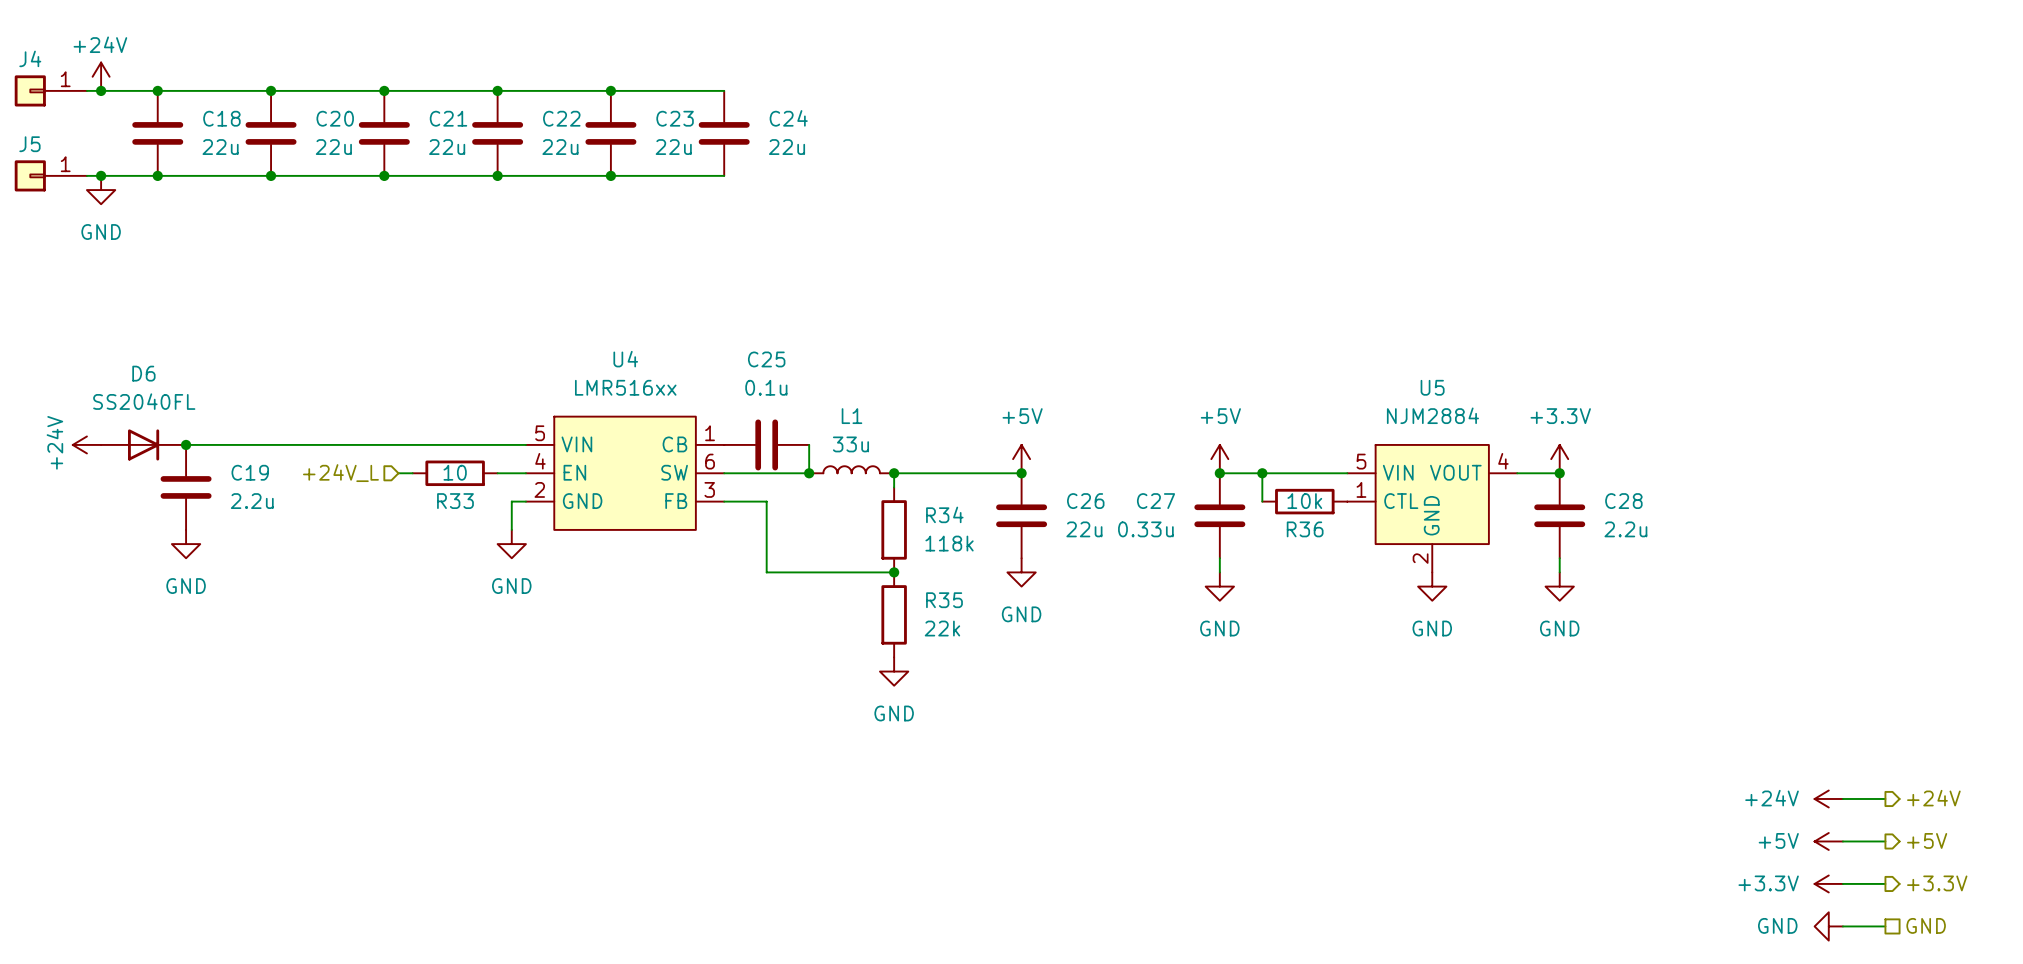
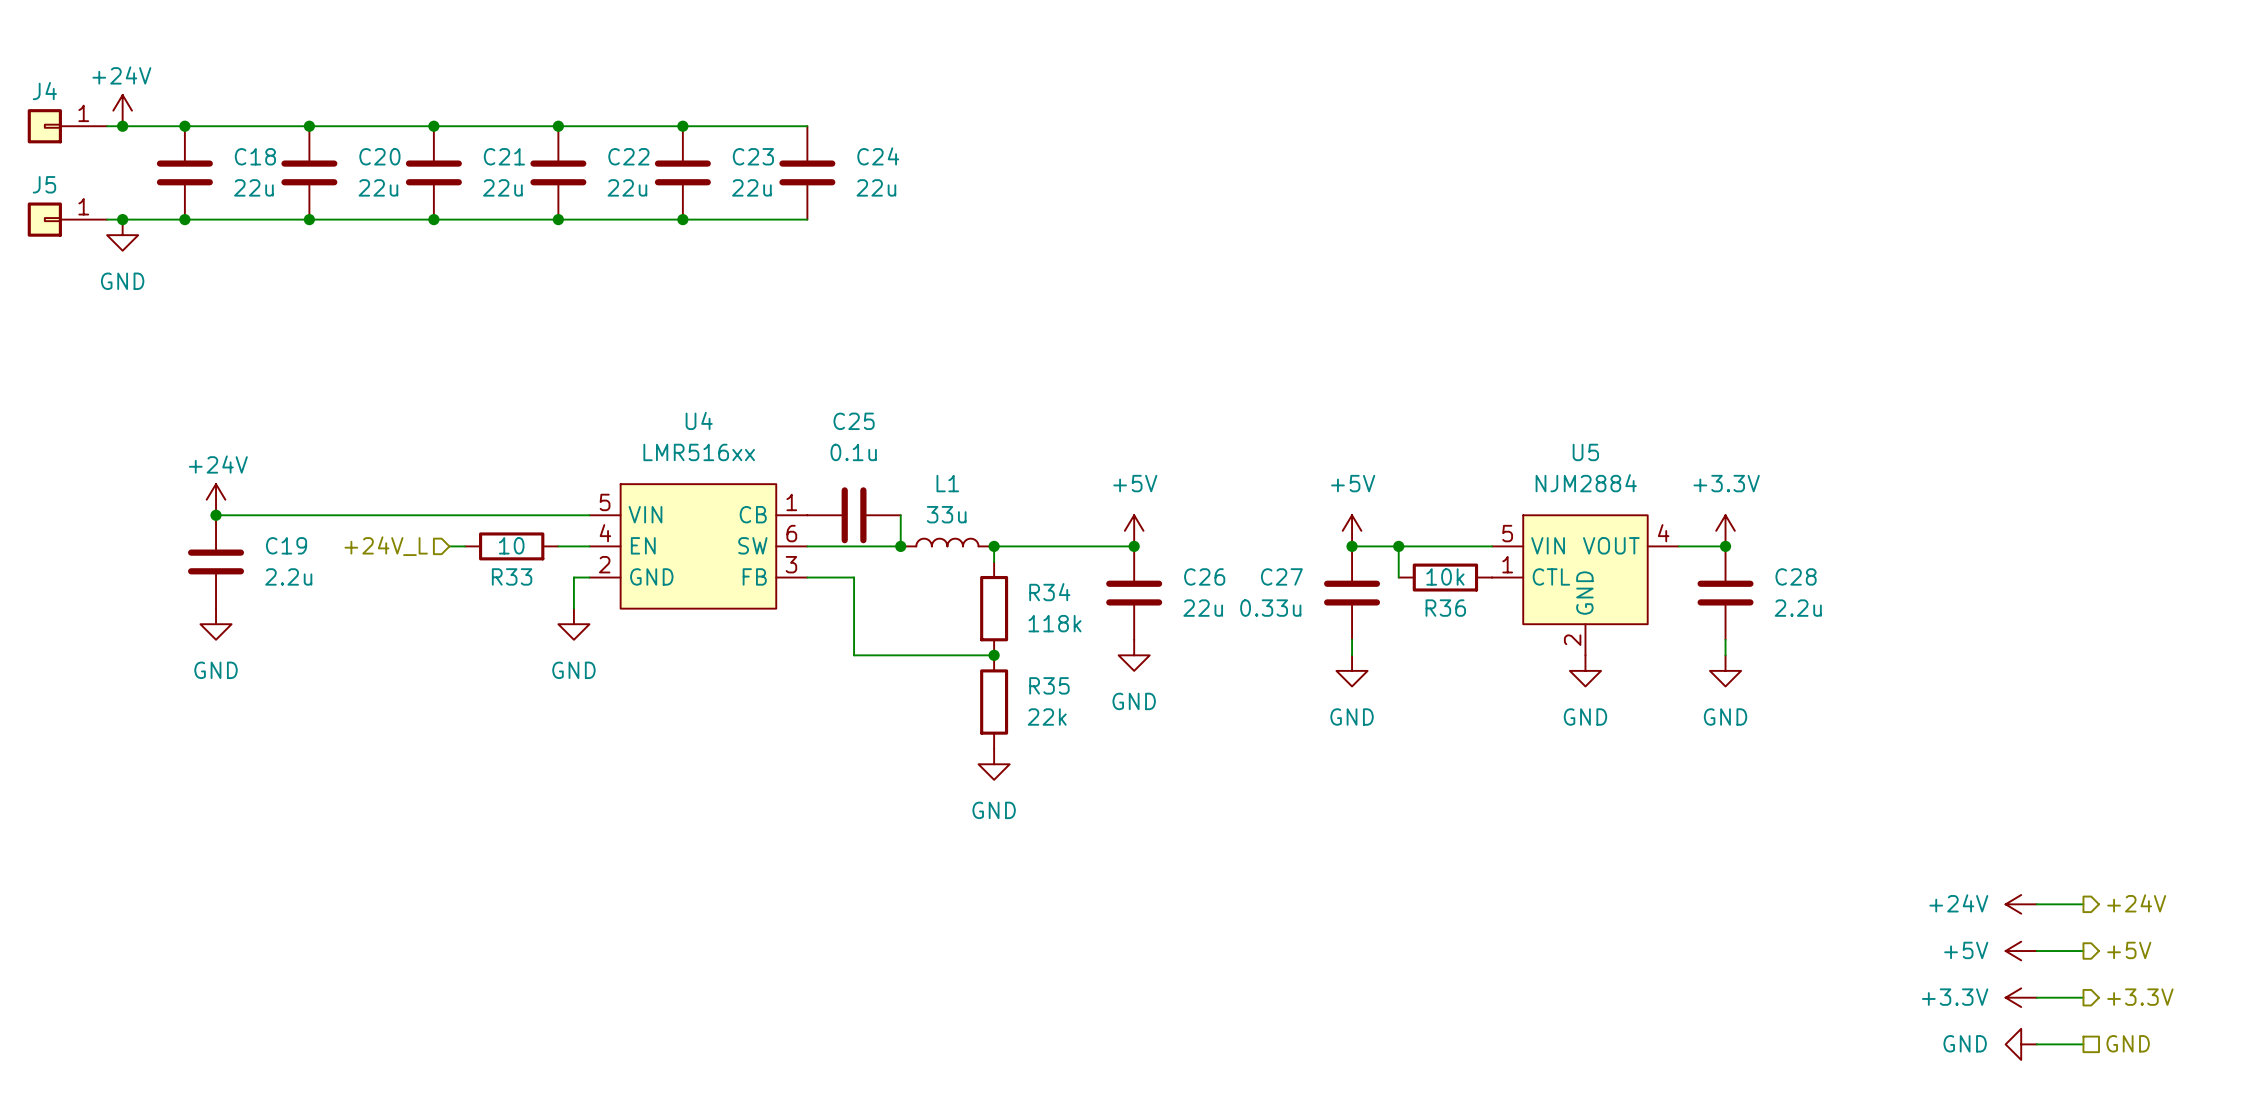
power symbol rotation: 0° (86, 444) -> 90° clockwise (216, 499)
power symbol position: +24V (86, 444) -> +24V (216, 499)
D6: SS2040FL (143, 444) -> none

